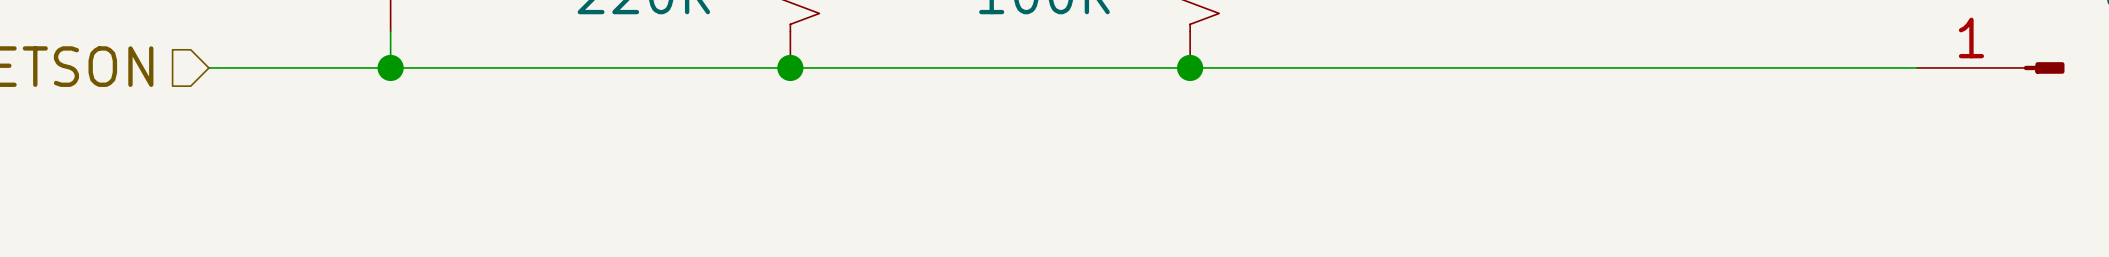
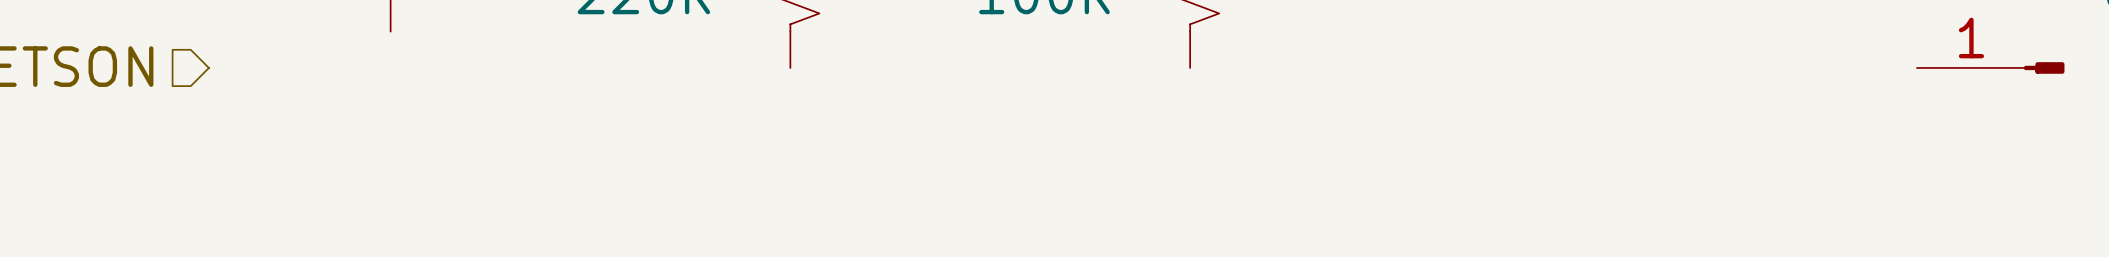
wire: (390, 31) (390, 67) -> none
wire: (208, 67) (1916, 67) -> none
junction: (390, 67) -> none
junction: (790, 67) -> none
junction: (1190, 67) -> none

